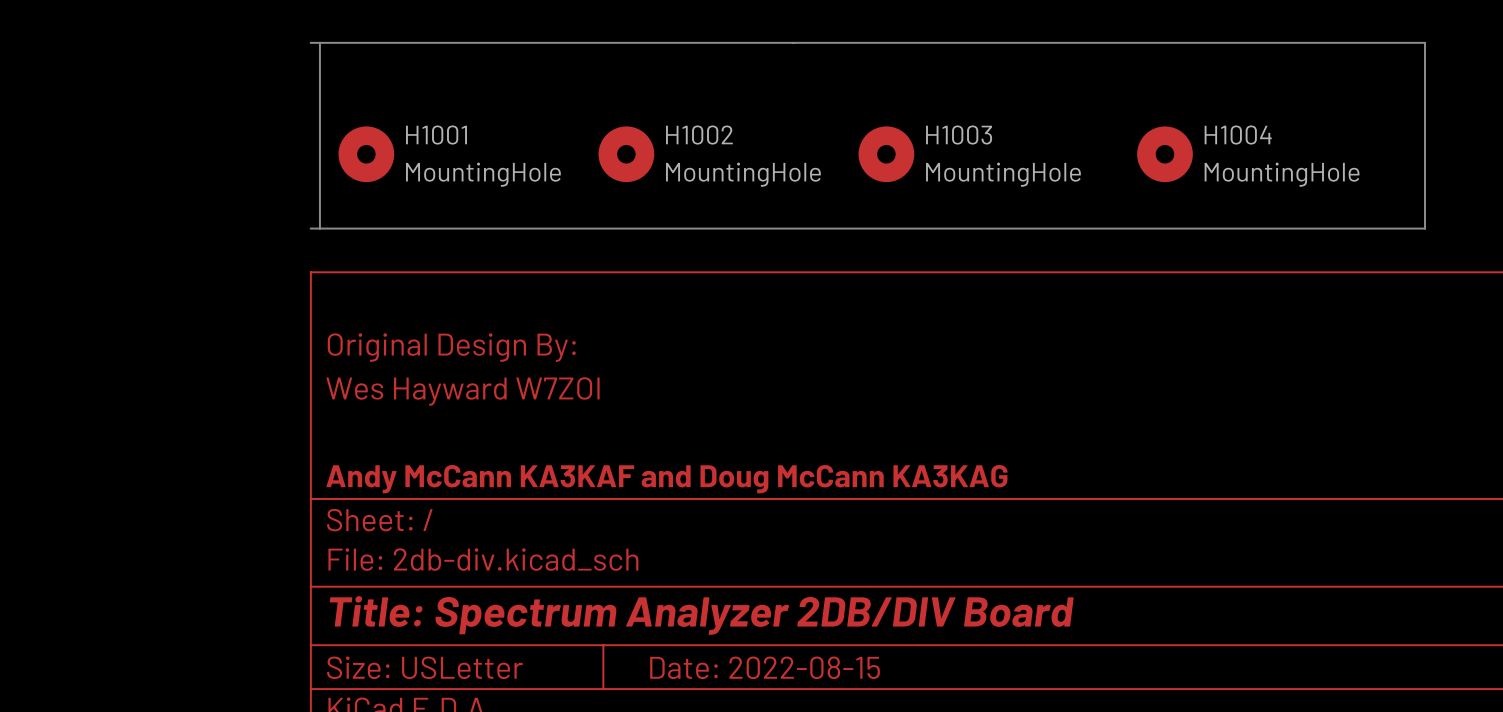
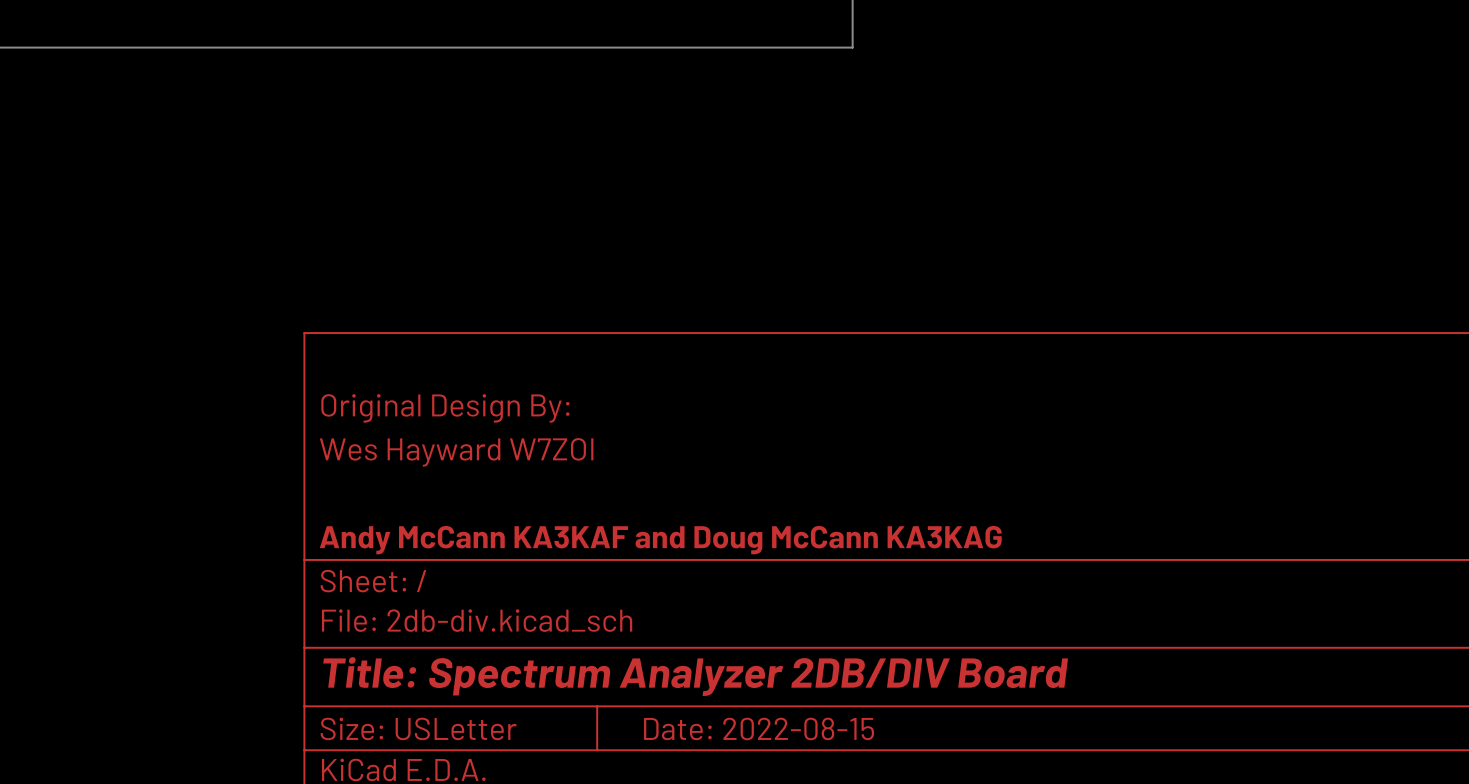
line: (310, 42) (1425, 42) (1425, 228) (310, 228) -> none
line: (319, 42) (319, 228) -> none
H1001: MountingHole (366, 154) -> none
H1002: MountingHole (626, 154) -> none
H1003: MountingHole (886, 154) -> none
H1004: MountingHole (1164, 154) -> none

